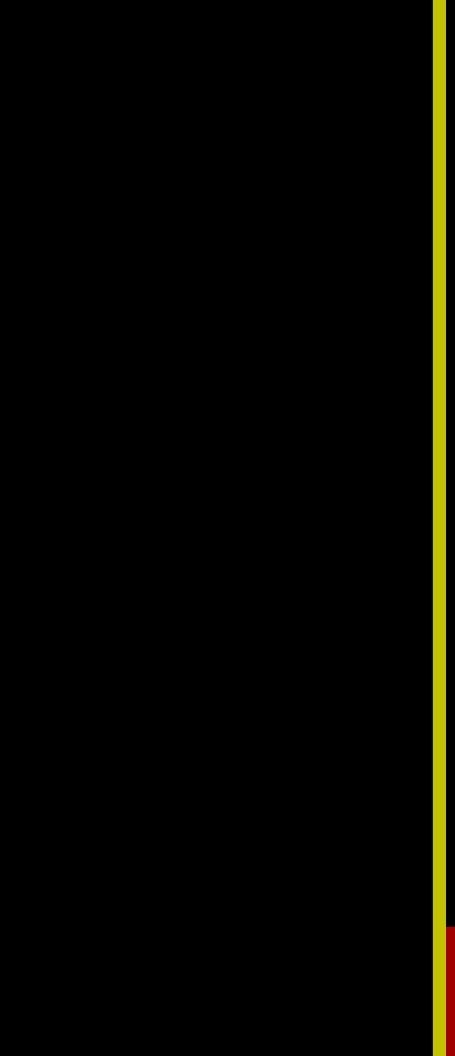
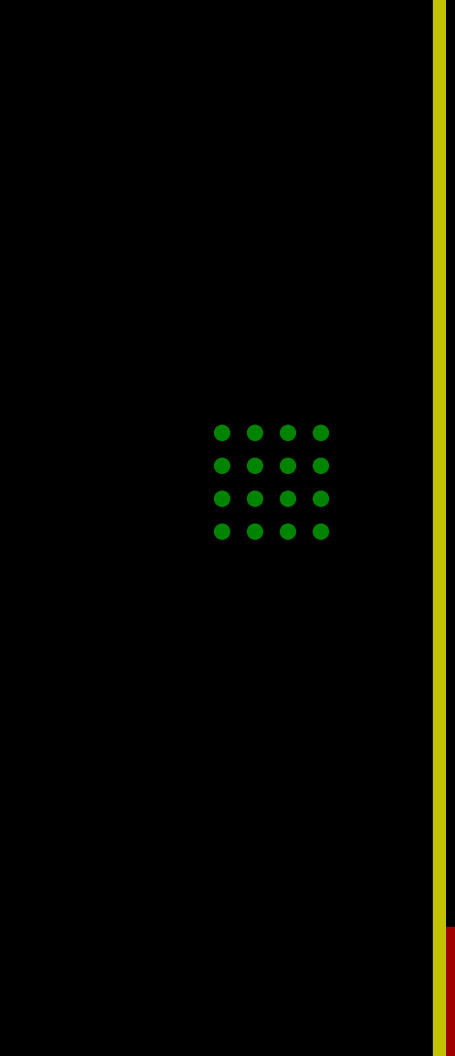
part: none -> (271, 482)

